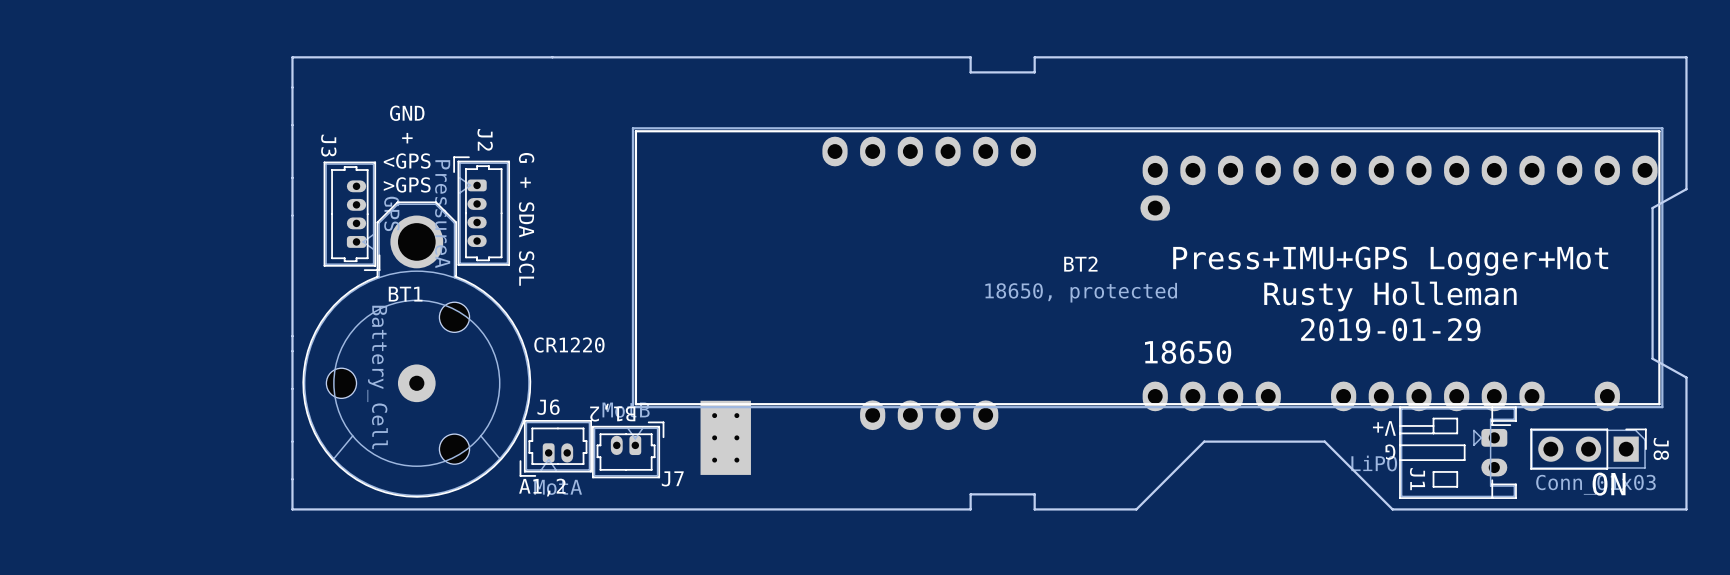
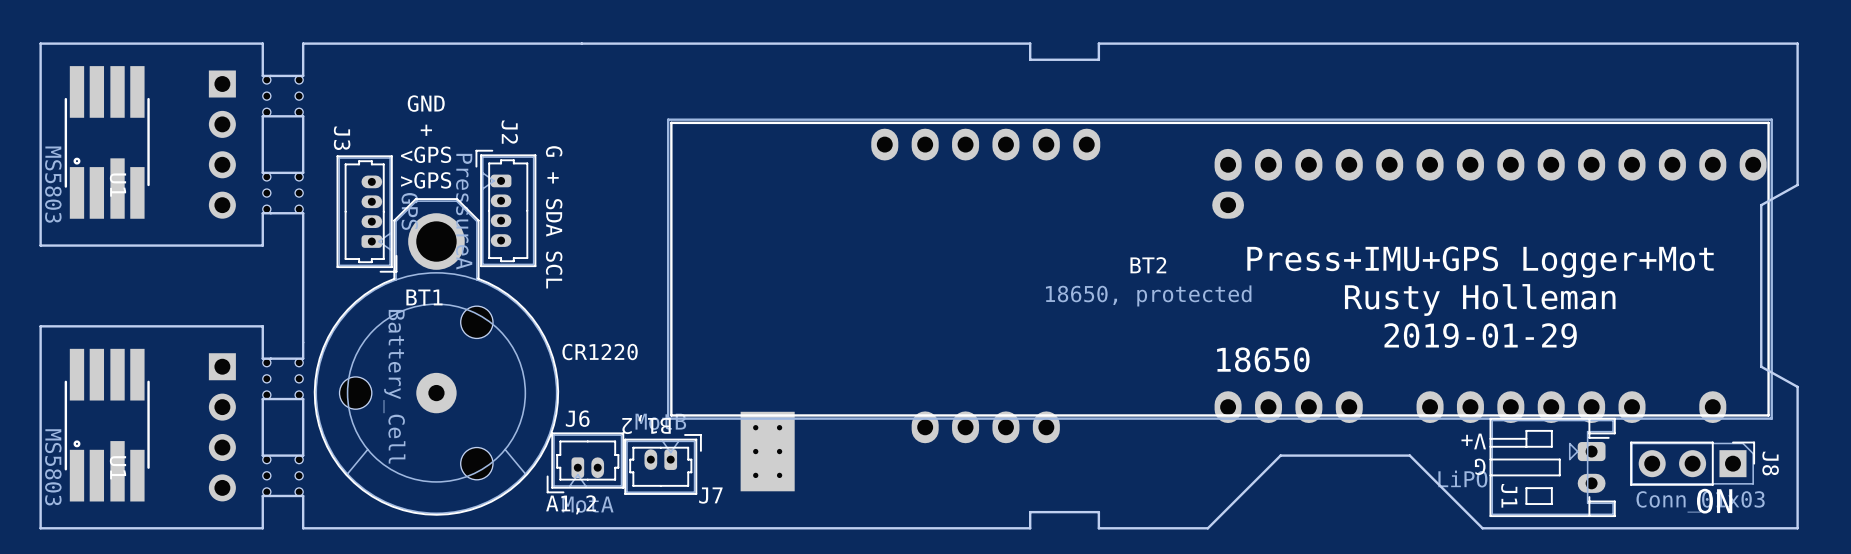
board edge: (292, 87) (292, 125) -> (303, 172) (262, 172) (262, 116) (303, 116)
part: none -> (282, 96)
part: none -> MS5803 (107, 142)
part: none -> (222, 144)
board edge: (292, 177) (292, 215) -> (303, 75) (262, 75) (262, 43) (40, 43) (40, 245) (262, 245) (262, 213) (303, 213)
part: none -> (282, 193)
board edge: (292, 351) (292, 388) -> (303, 358) (262, 358) (262, 326) (40, 326) (40, 528) (262, 528) (262, 495) (303, 495)
part: none -> (282, 378)
part: none -> MS5803 (107, 425)
part: none -> (222, 427)
board edge: (292, 441) (292, 479) -> (303, 455) (262, 455) (262, 399) (303, 399)
part: none -> (282, 475)

